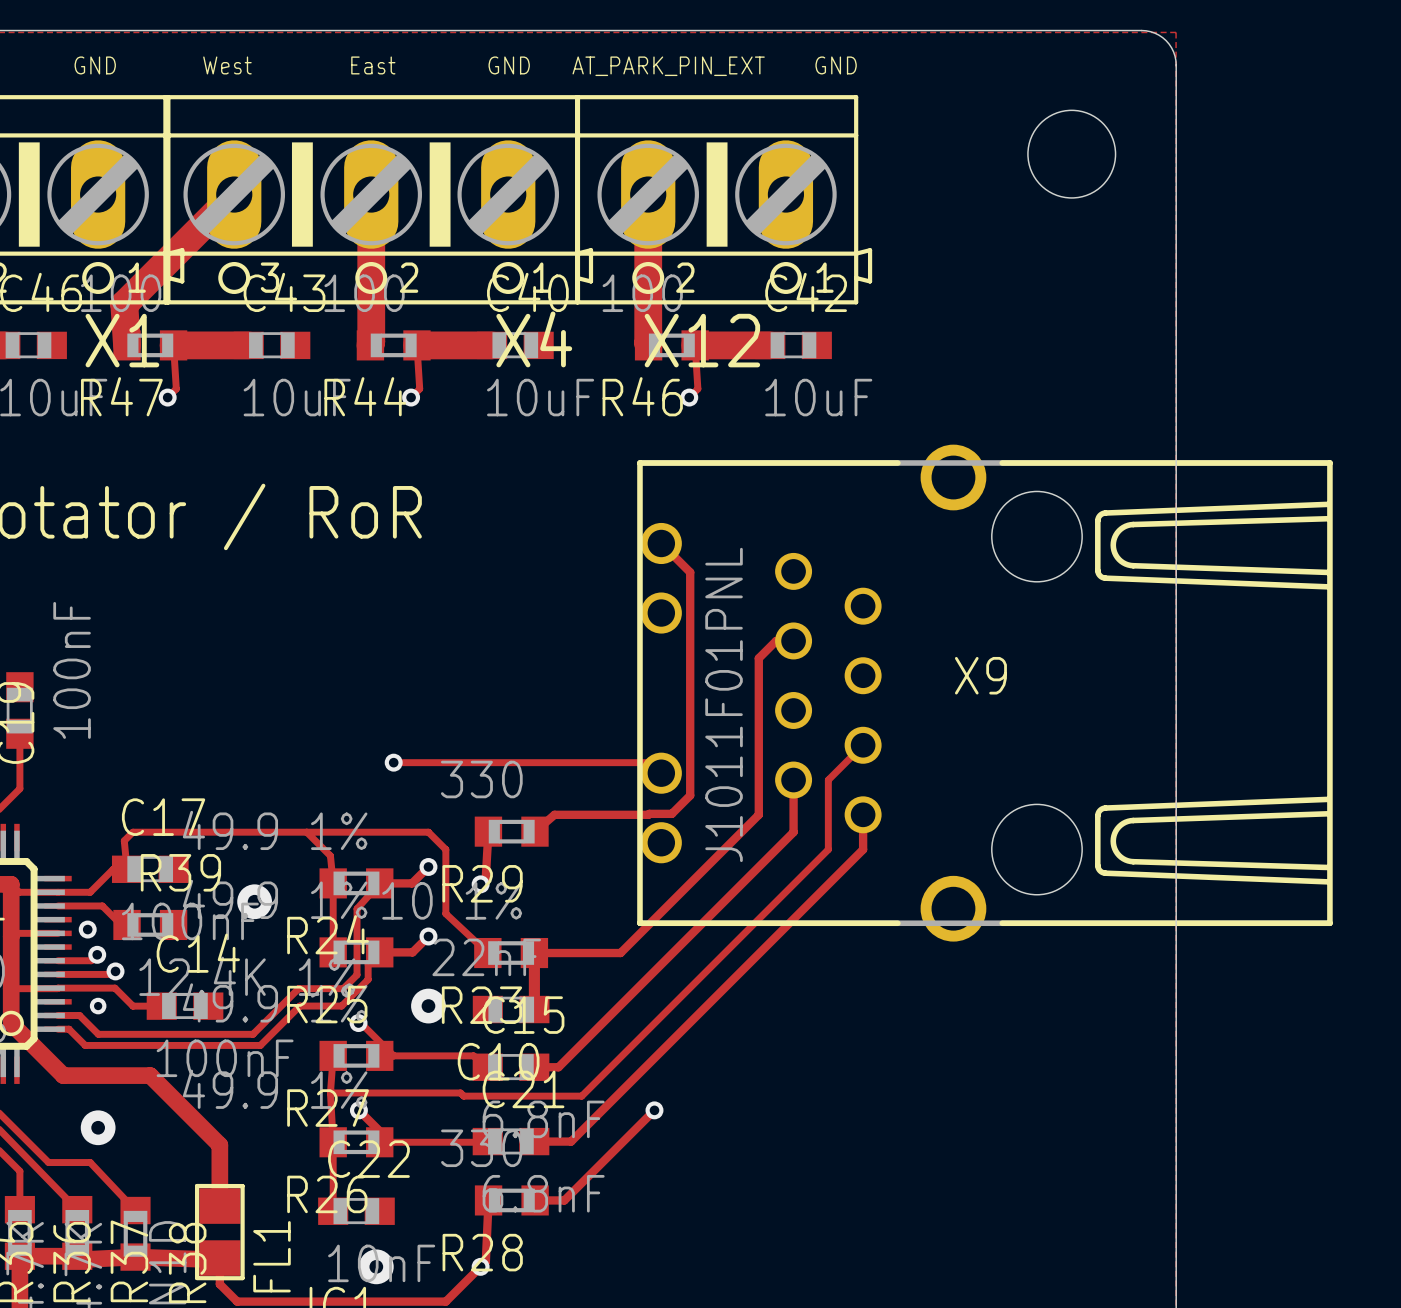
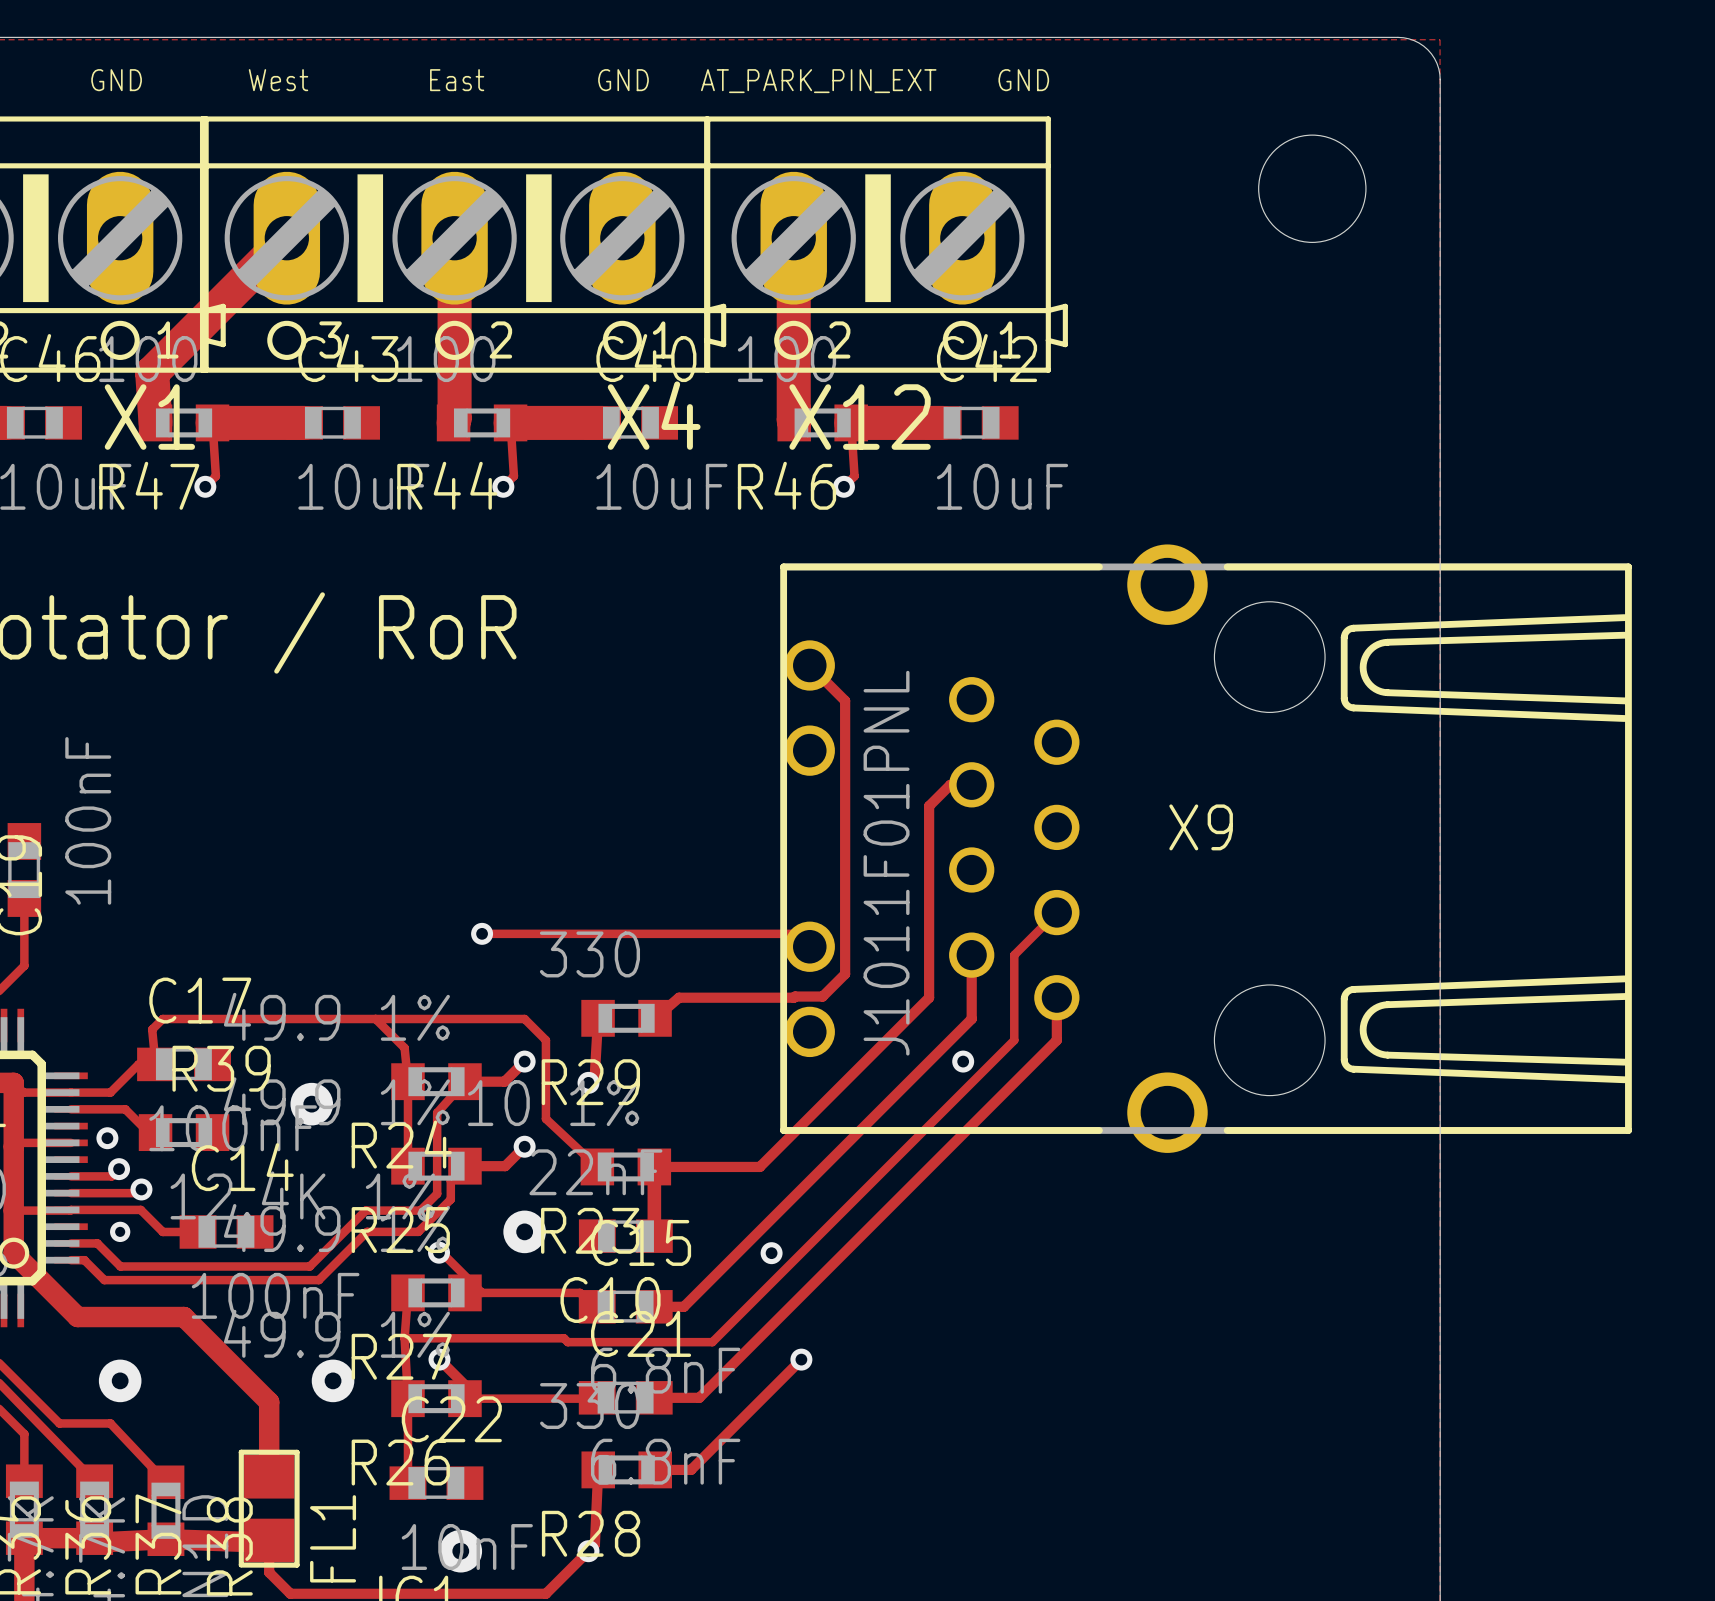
via: none -> (963, 1061)
via: none -> (771, 1253)
via: none -> (333, 1380)

